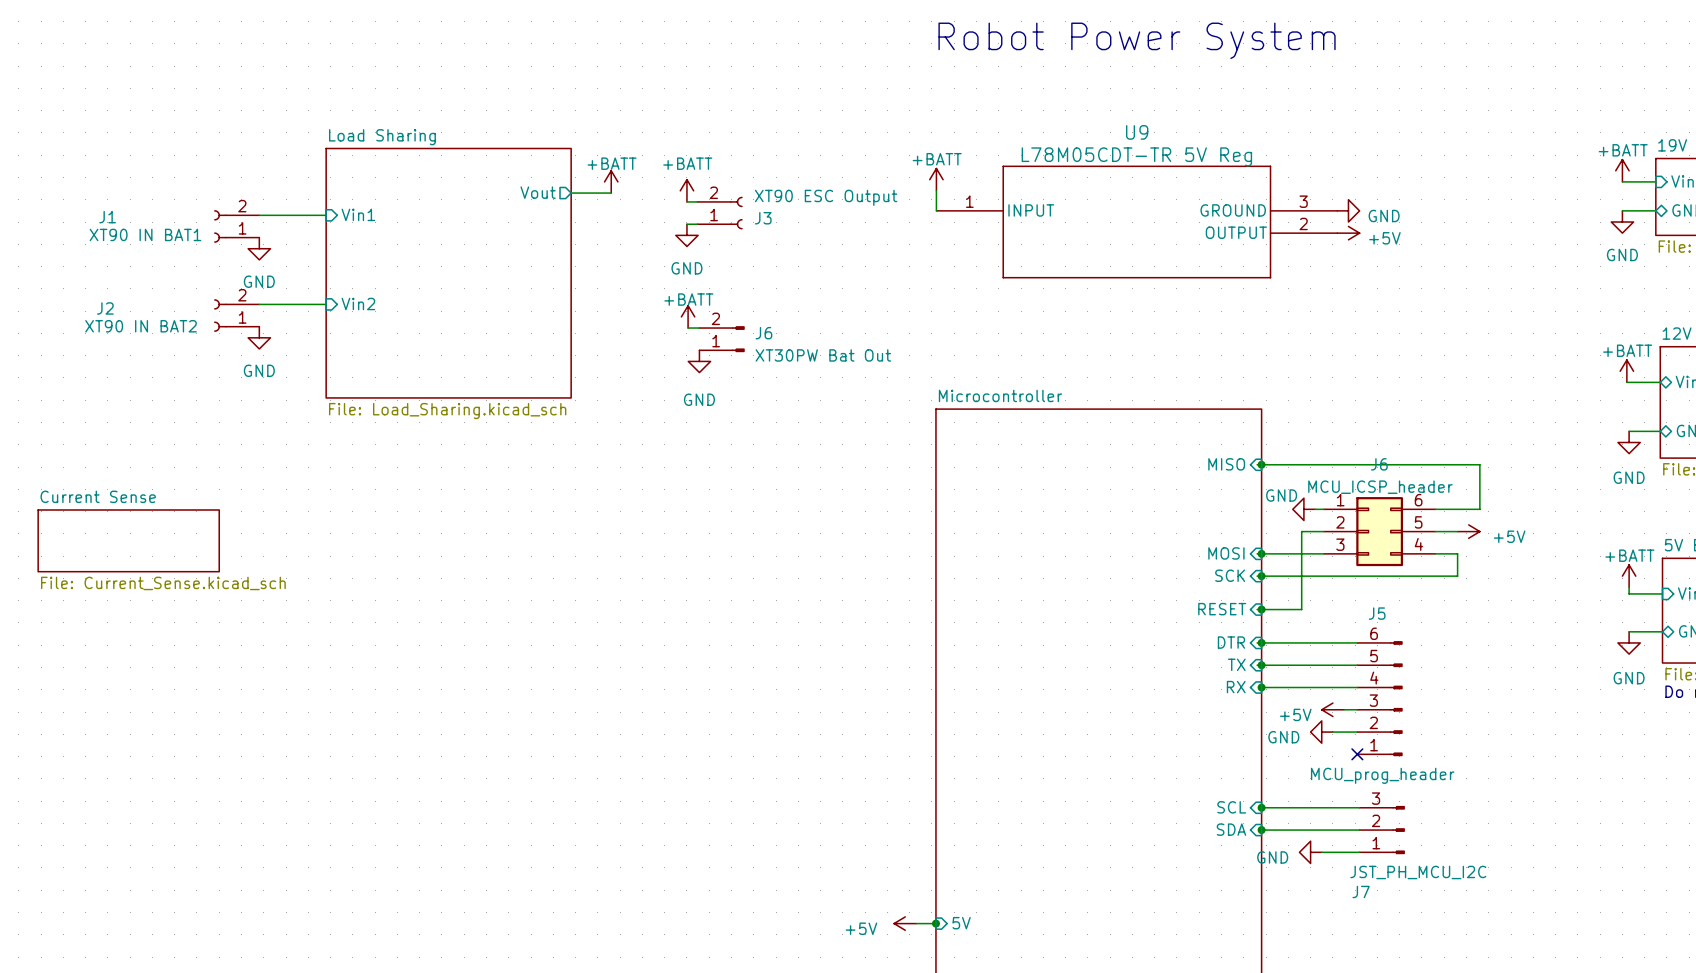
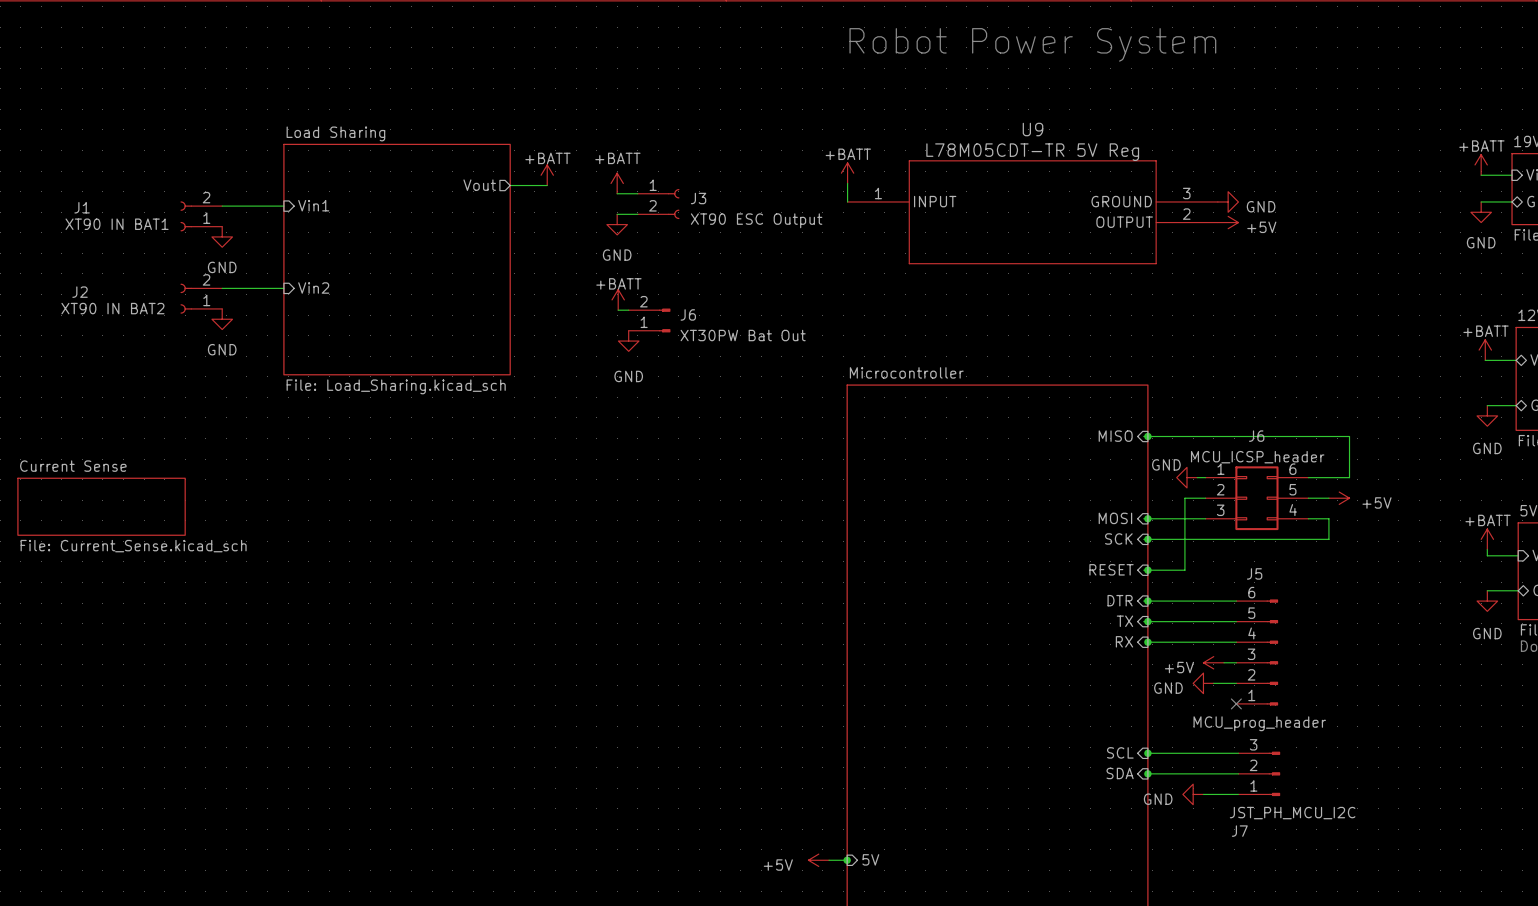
J3 flip: as is (736, 213) -> up-down (673, 204)

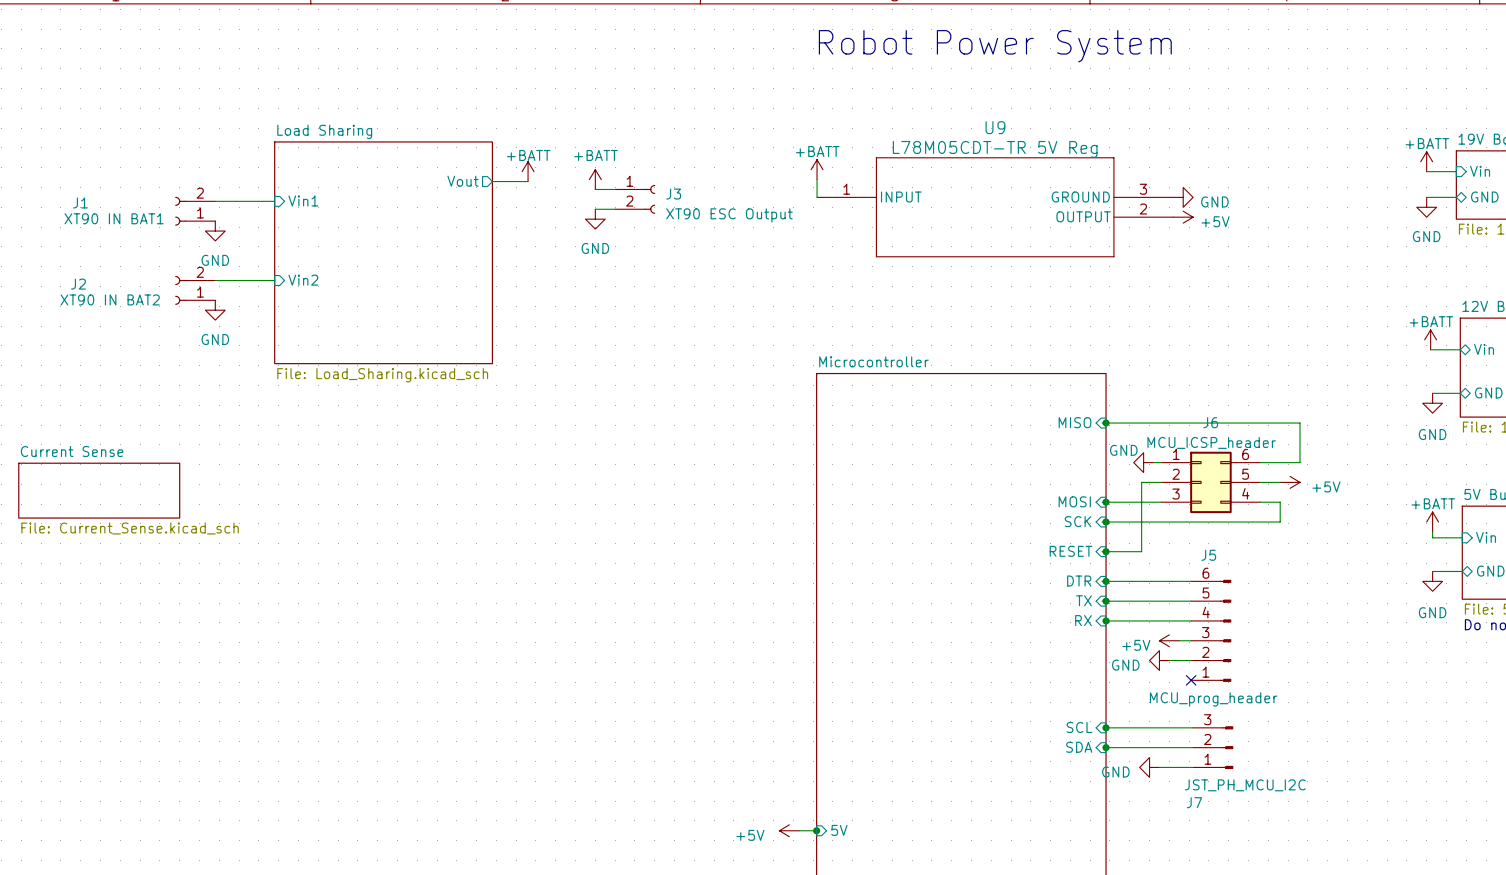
power symbol: +BATT (618, 299) -> none
wire: (618, 310) (628, 310) -> none
J6: XT30PW Bat Out (649, 320) -> none
power symbol: GND (628, 341) -> none

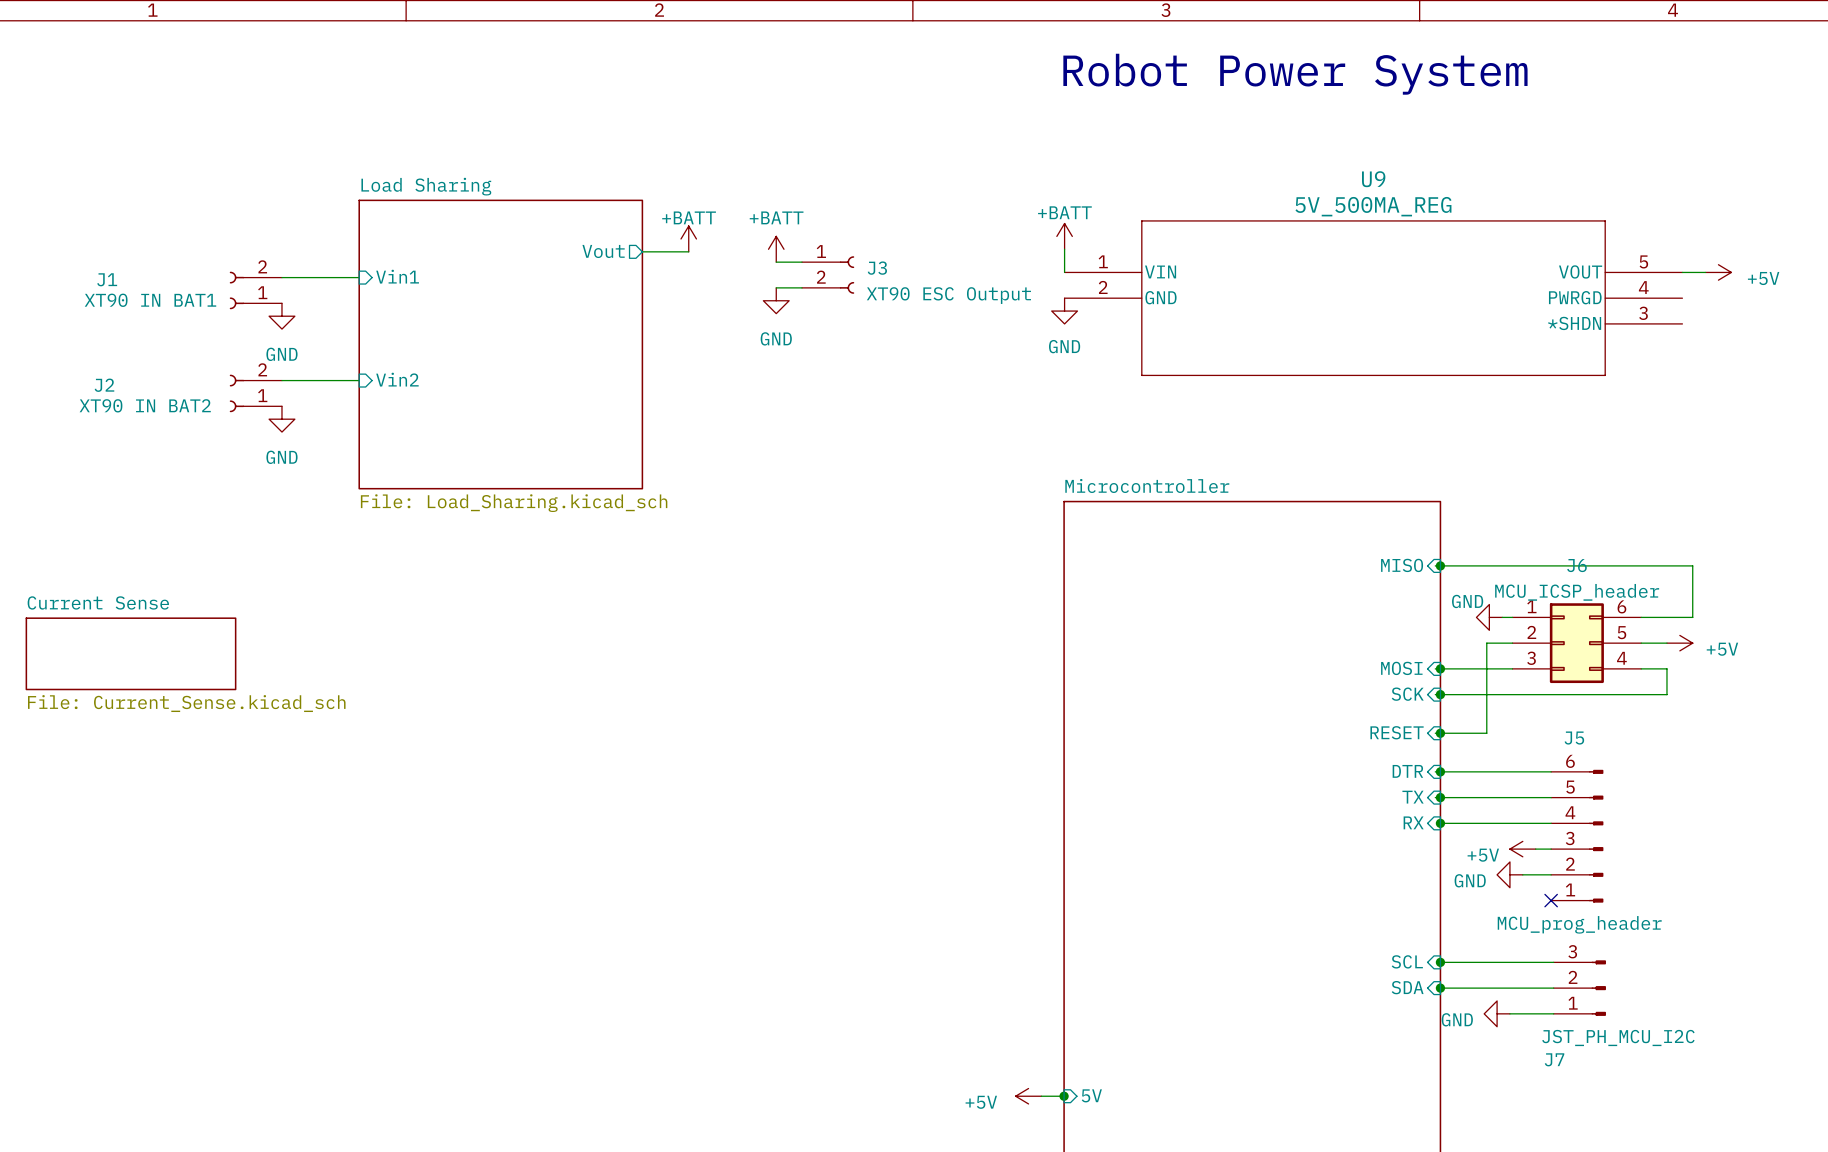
U9 value: L78M05CDT-TR 5V Reg (995, 149) -> 5V_500MA_REG (1373, 206)
U9 symbol: [817, 157, 1174, 258] -> [1064, 220, 1683, 377]
power symbol: GND (1183, 197) -> none
wire: none -> (1682, 272) (1705, 272)
power symbol position: +5V (1183, 217) -> +5V (1718, 272)
power symbol text position: +5V (1215, 221) -> +5V (1763, 278)
power symbol: none -> GND (1064, 311)

